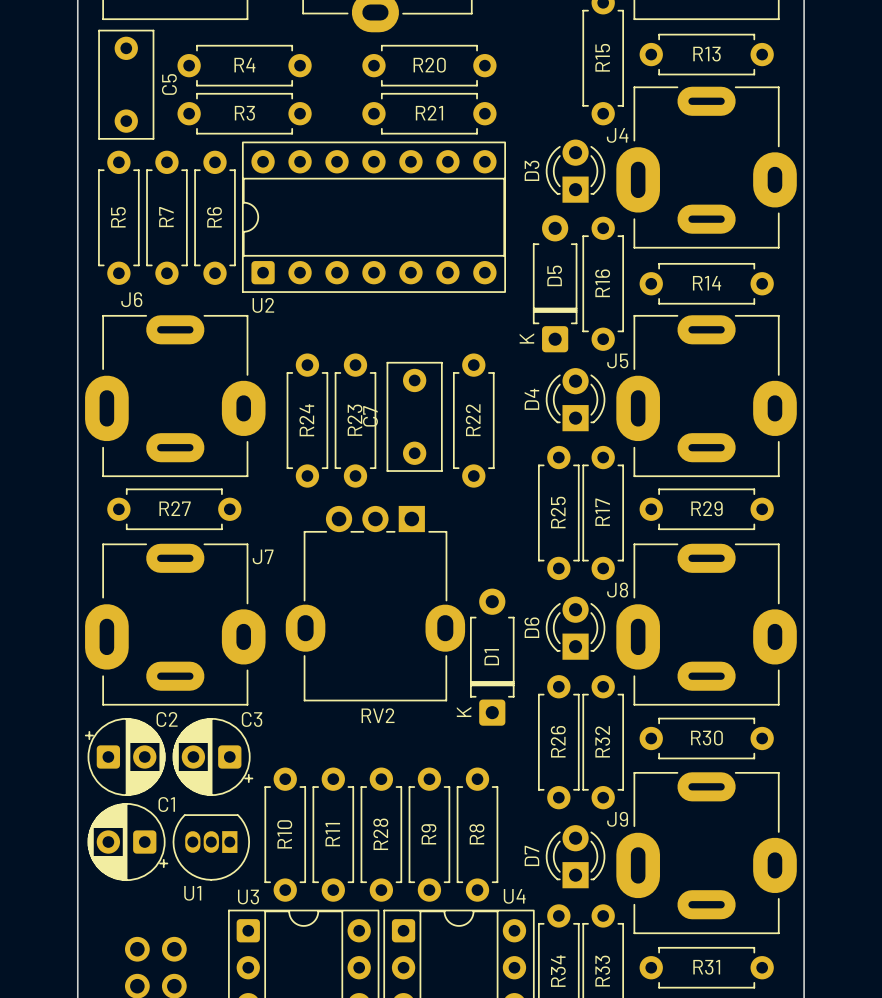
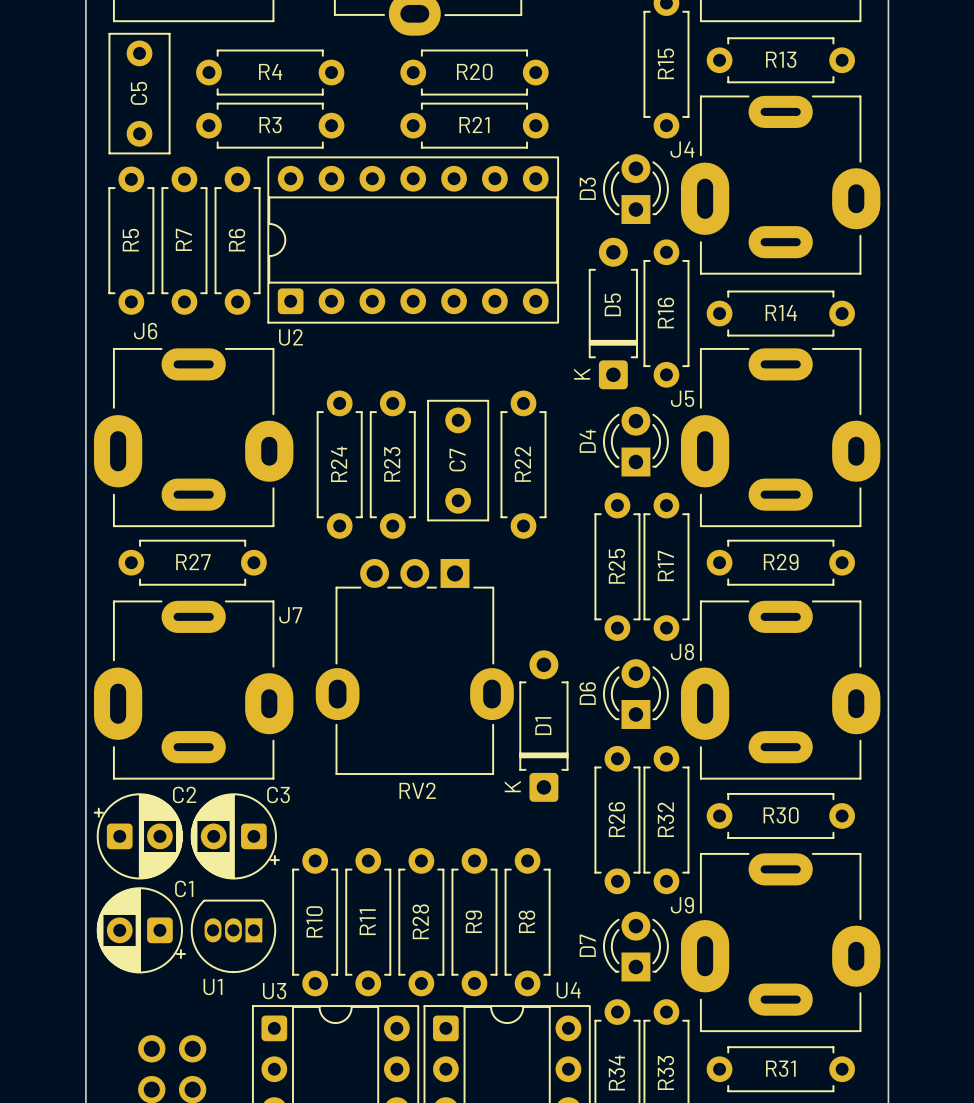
C5 name position: C5 (169, 84) -> C5 (138, 93)
C7 name position: C7 (370, 416) -> C7 (457, 460)

